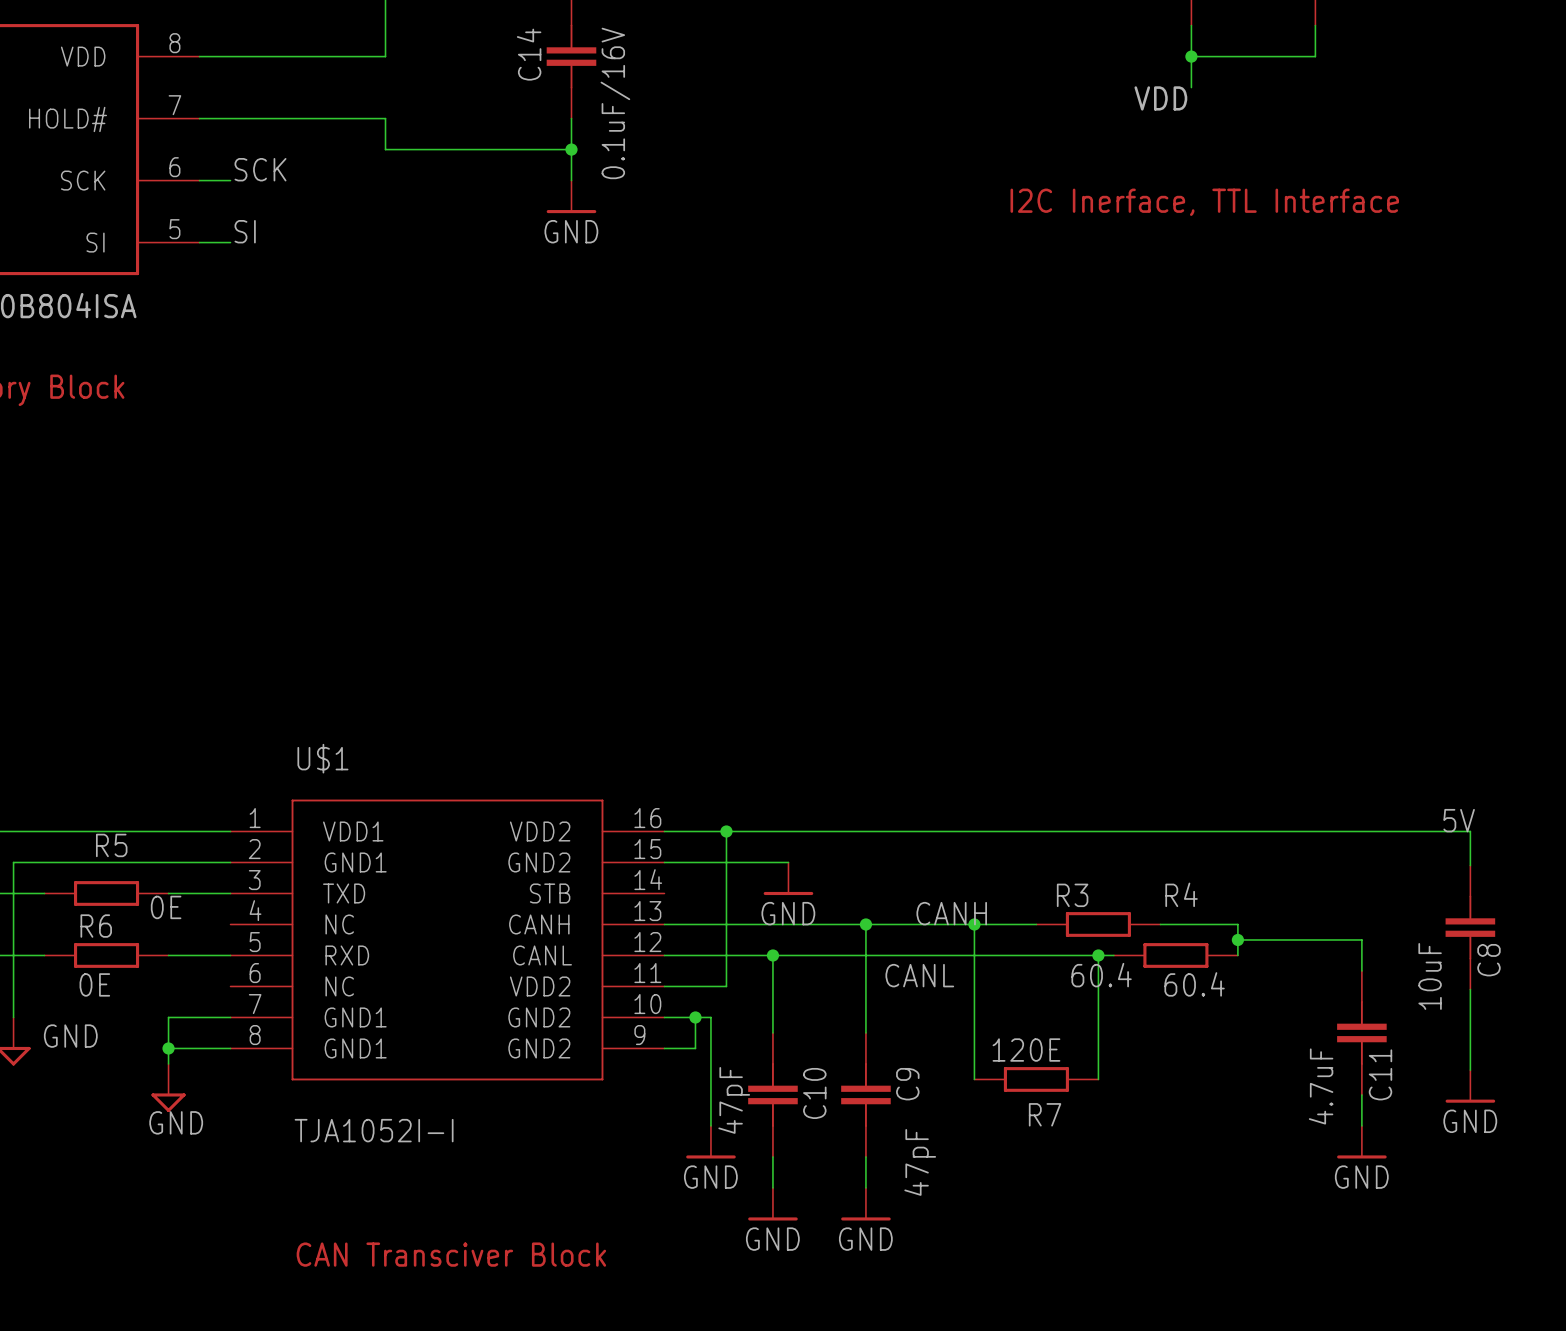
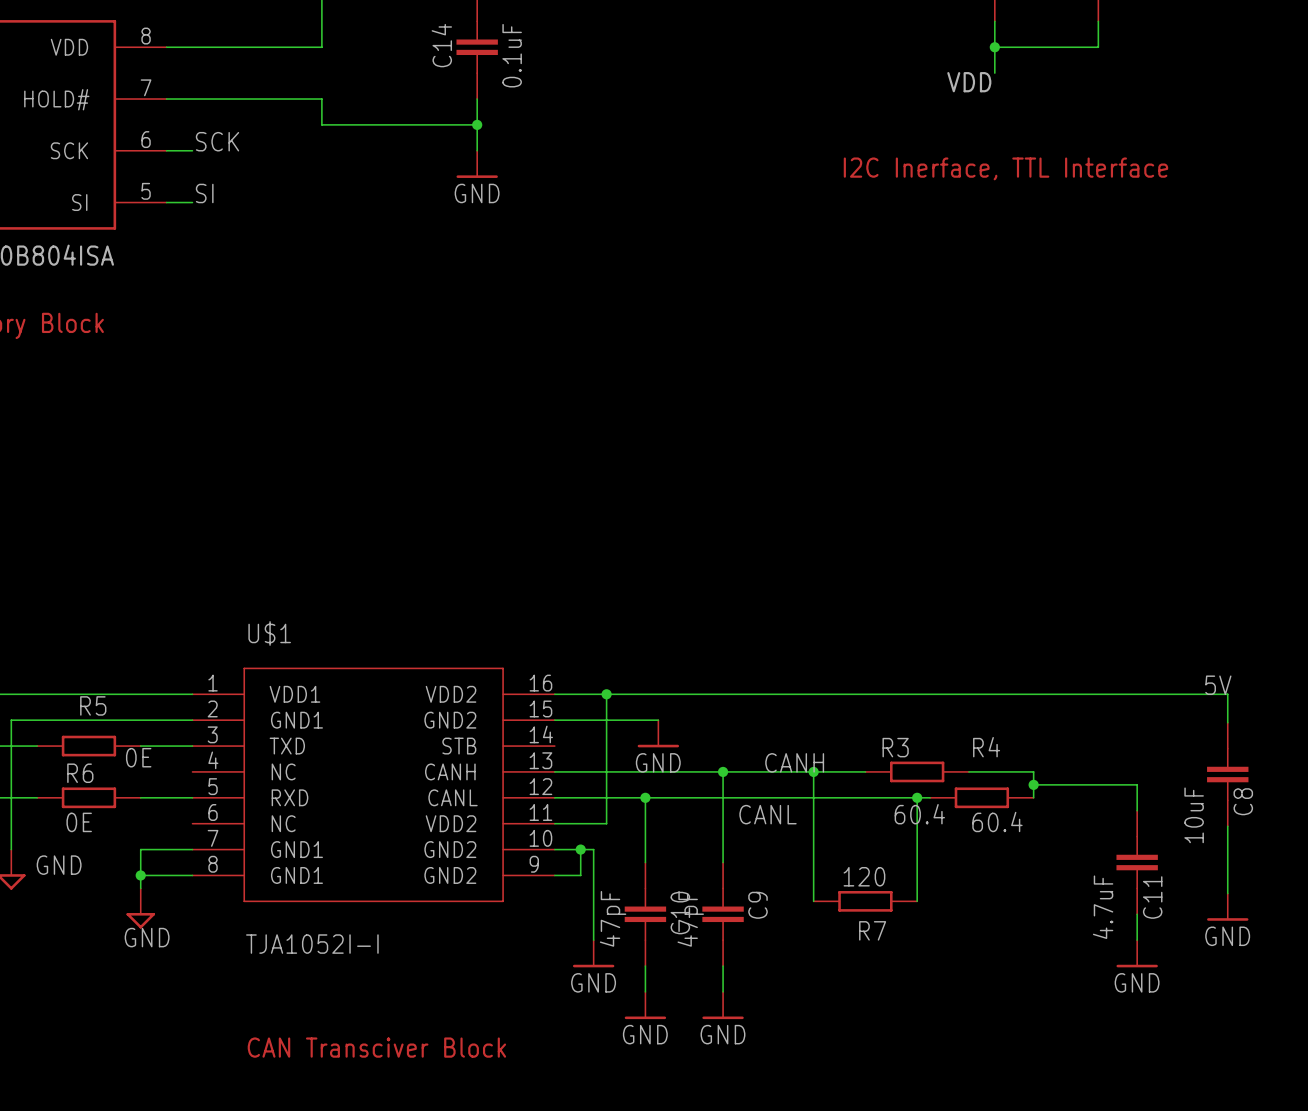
C14 value: 0.1uF/16V (615, 103) -> 0.1uF (512, 55)
R7 value: 120E (1026, 1050) -> 120 (864, 876)
C9 value position: 47pF (920, 1162) -> 47pF (690, 918)

